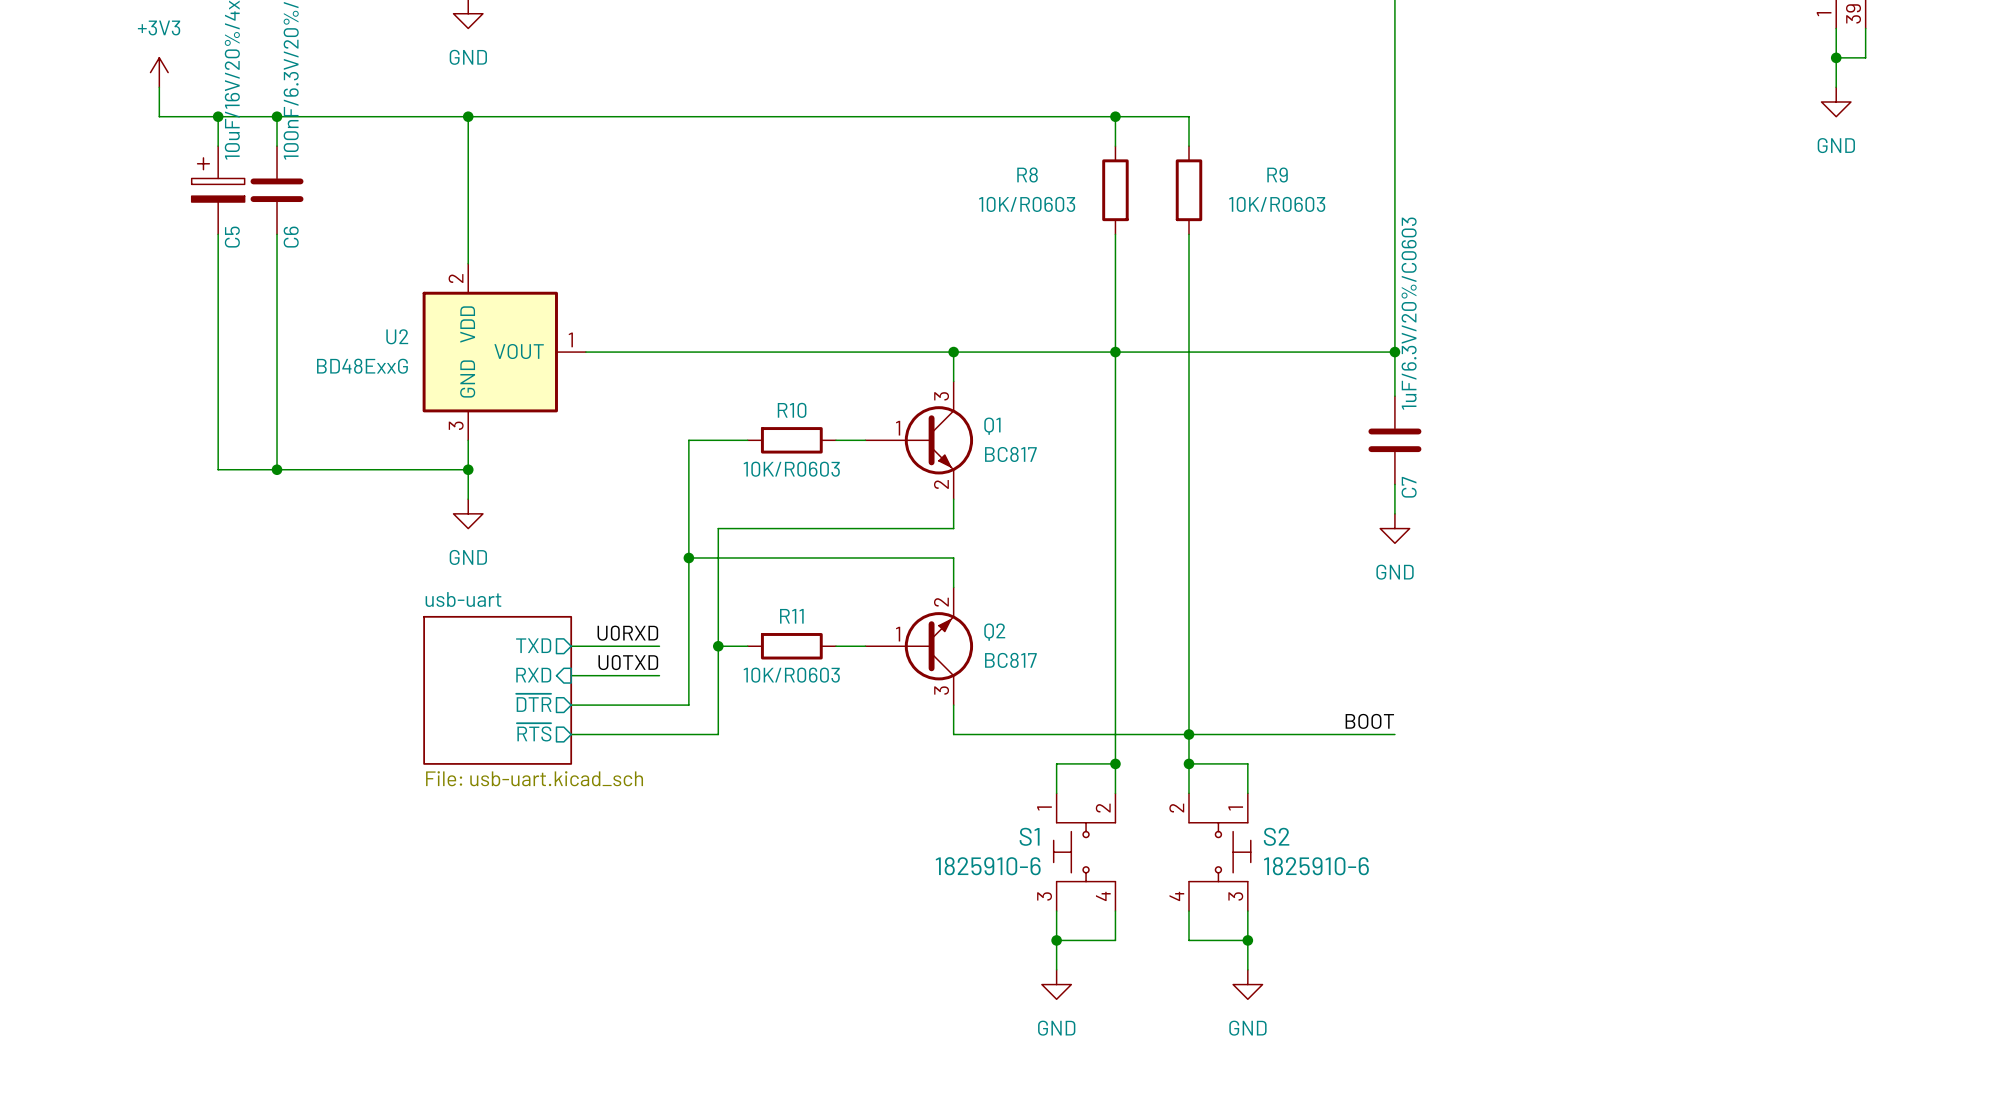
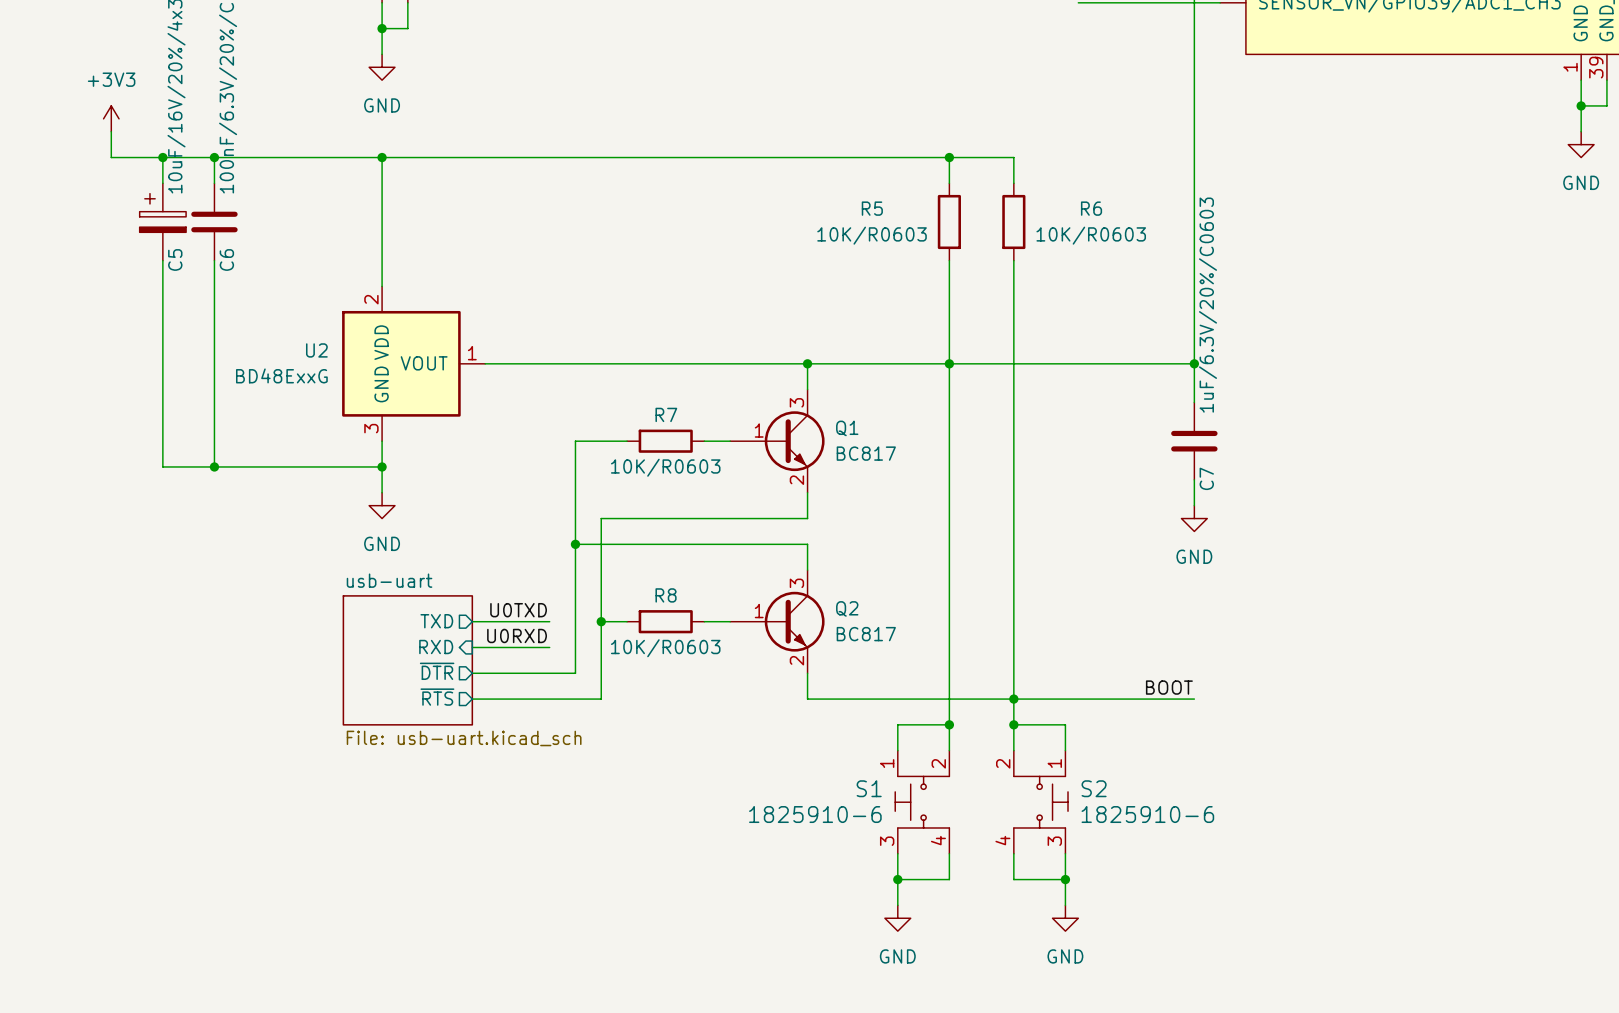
R8 name: R8 (1027, 174) -> R5 (872, 208)
R9 name: R9 (1277, 175) -> R6 (1091, 208)
R10 name: R10 (792, 410) -> R7 (666, 414)
R11 name: R11 (791, 616) -> R8 (666, 595)
label: U0RXD (627, 633) -> U0TXD (518, 610)
Q2 flip: as is (938, 646) -> up-down (794, 621)
label: U0TXD (628, 662) -> U0RXD (517, 635)

